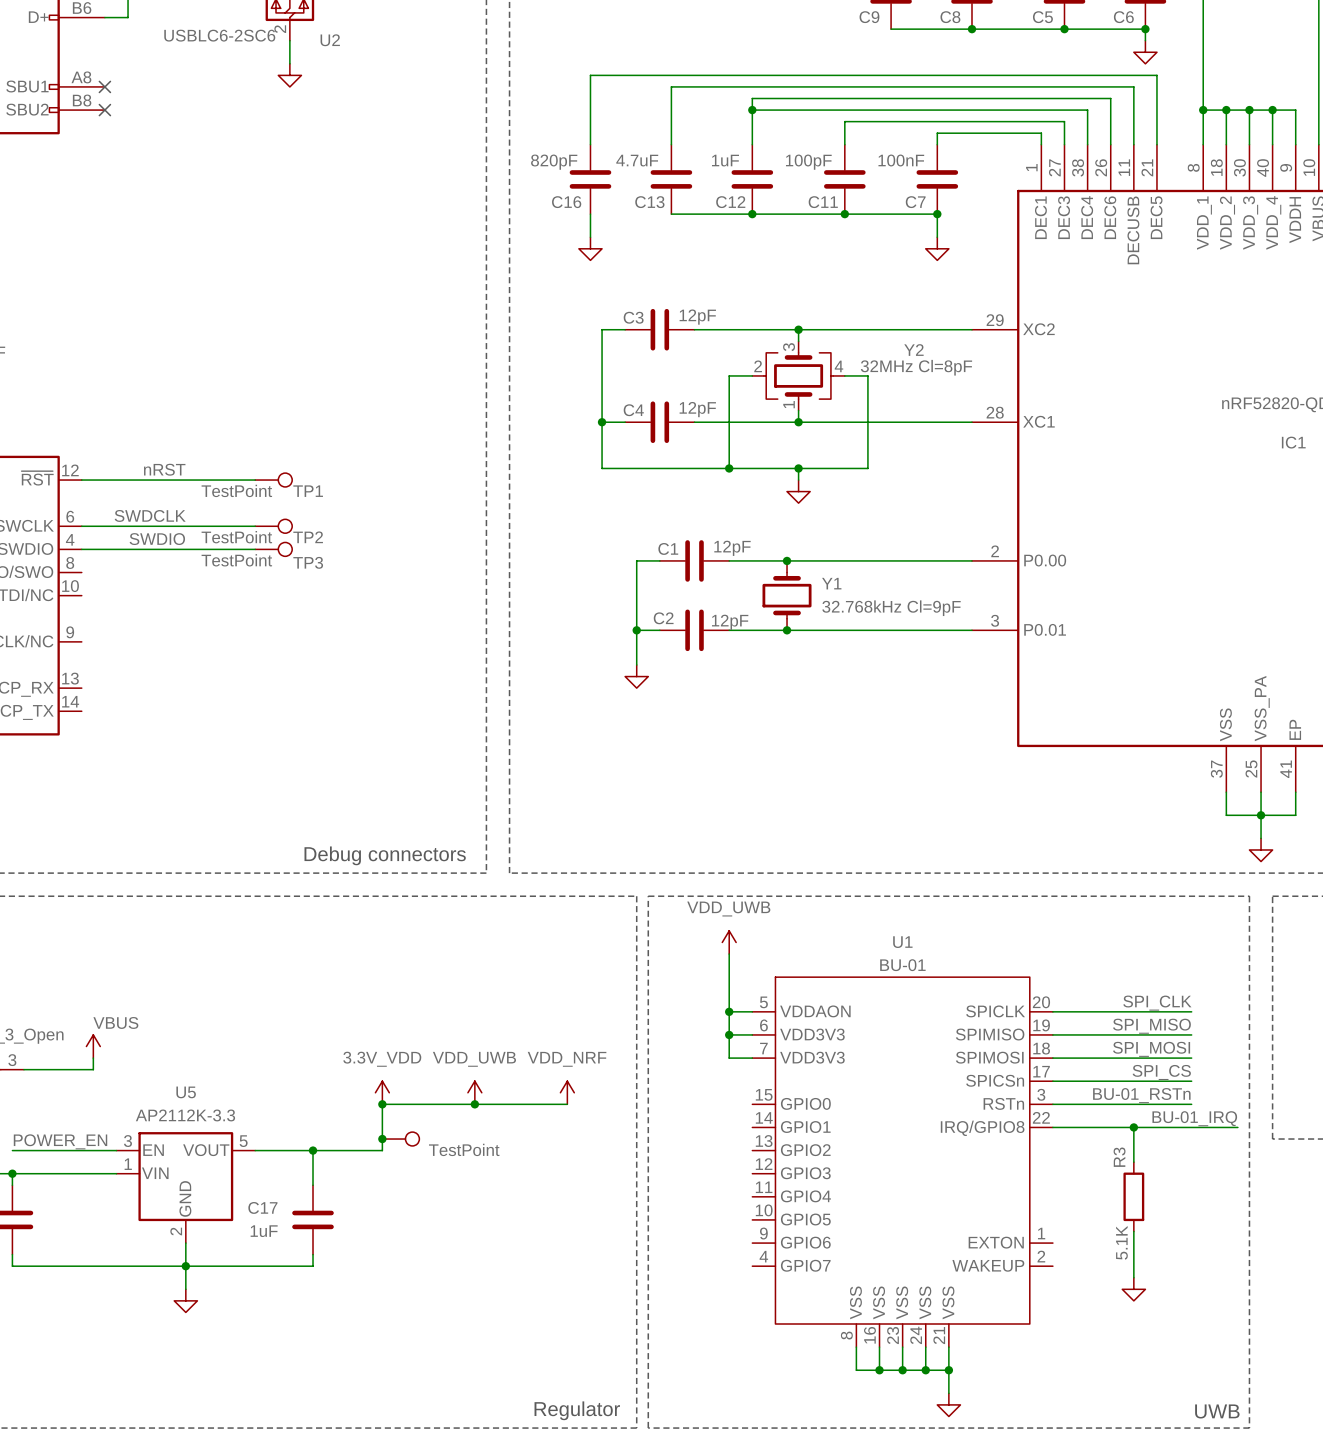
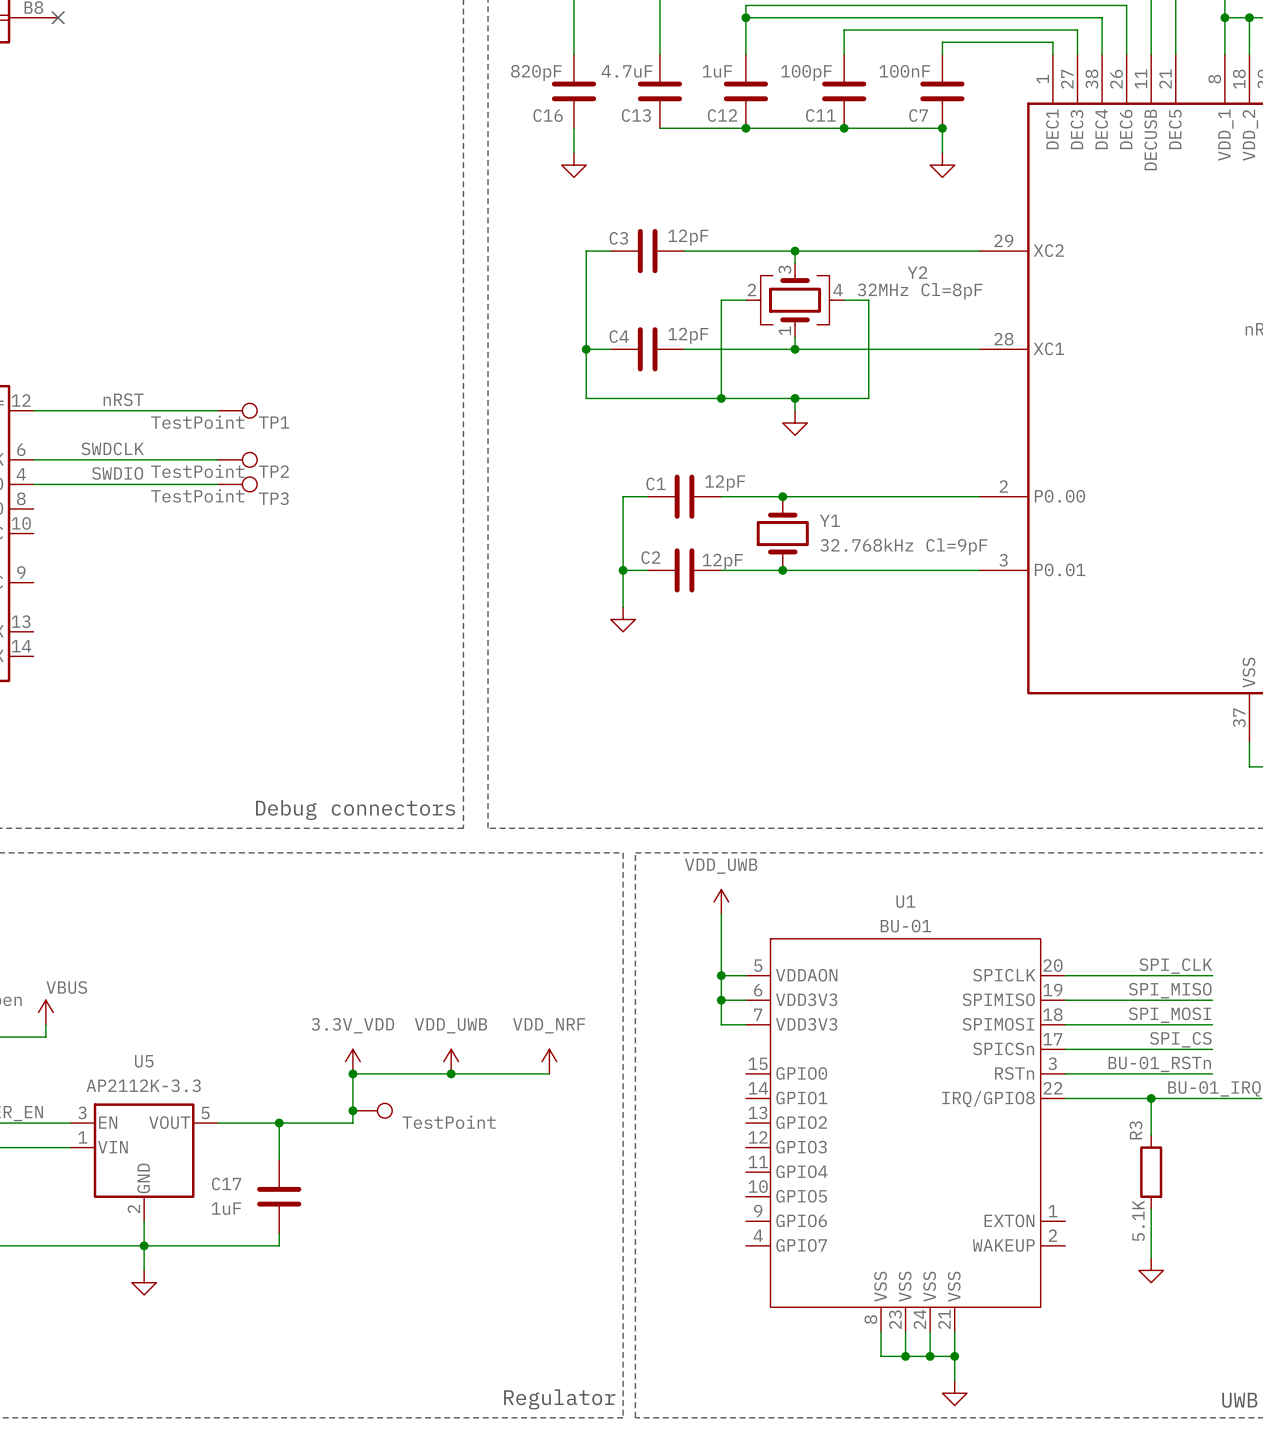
U1 symbol: [752, 977, 1053, 1348] -> [745, 938, 1066, 1332]
wire: (856, 1347) (856, 1370) (879, 1370) -> none
junction: (879, 1370) -> none

